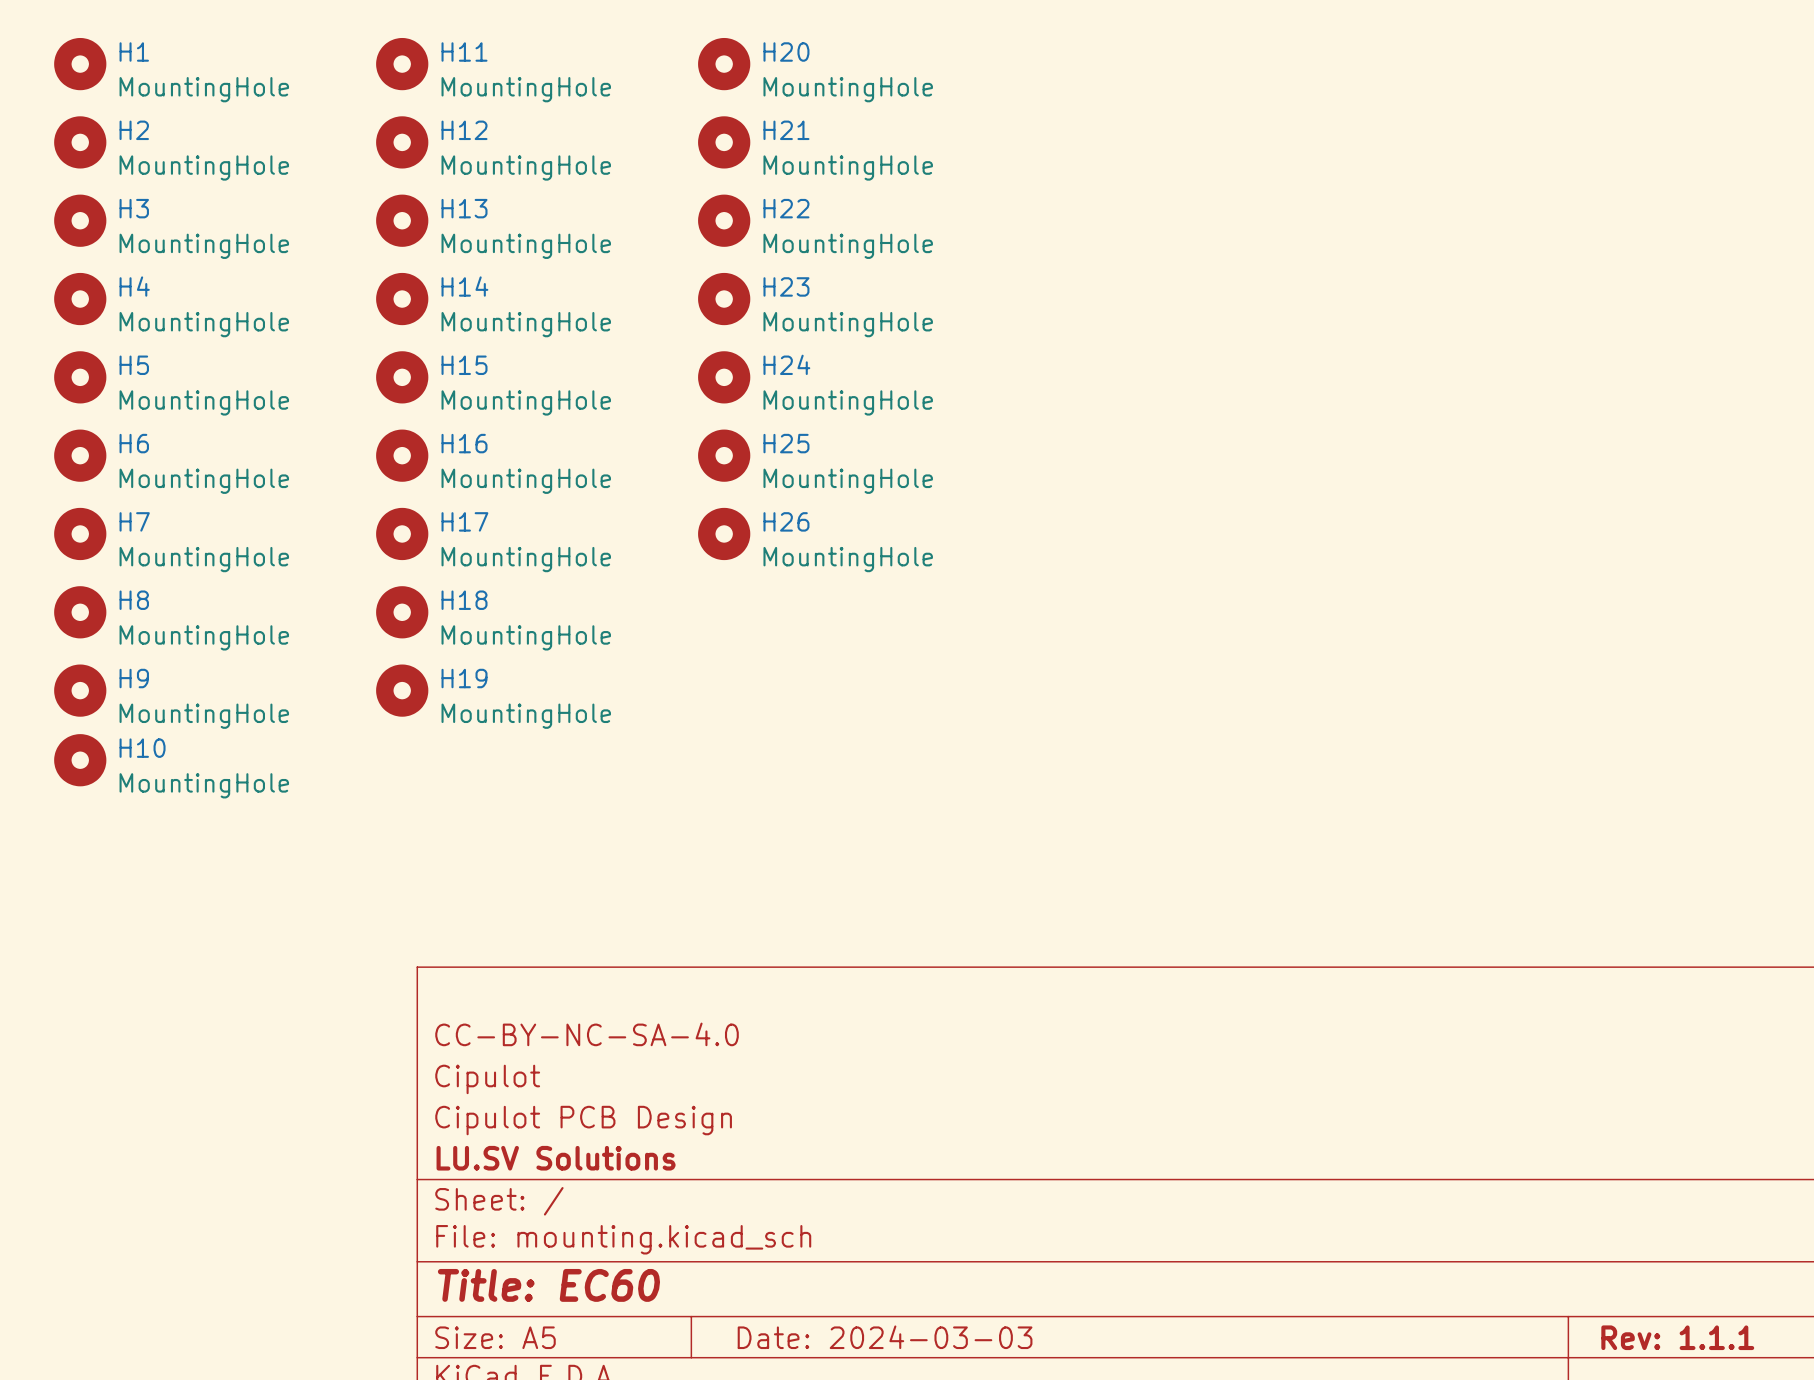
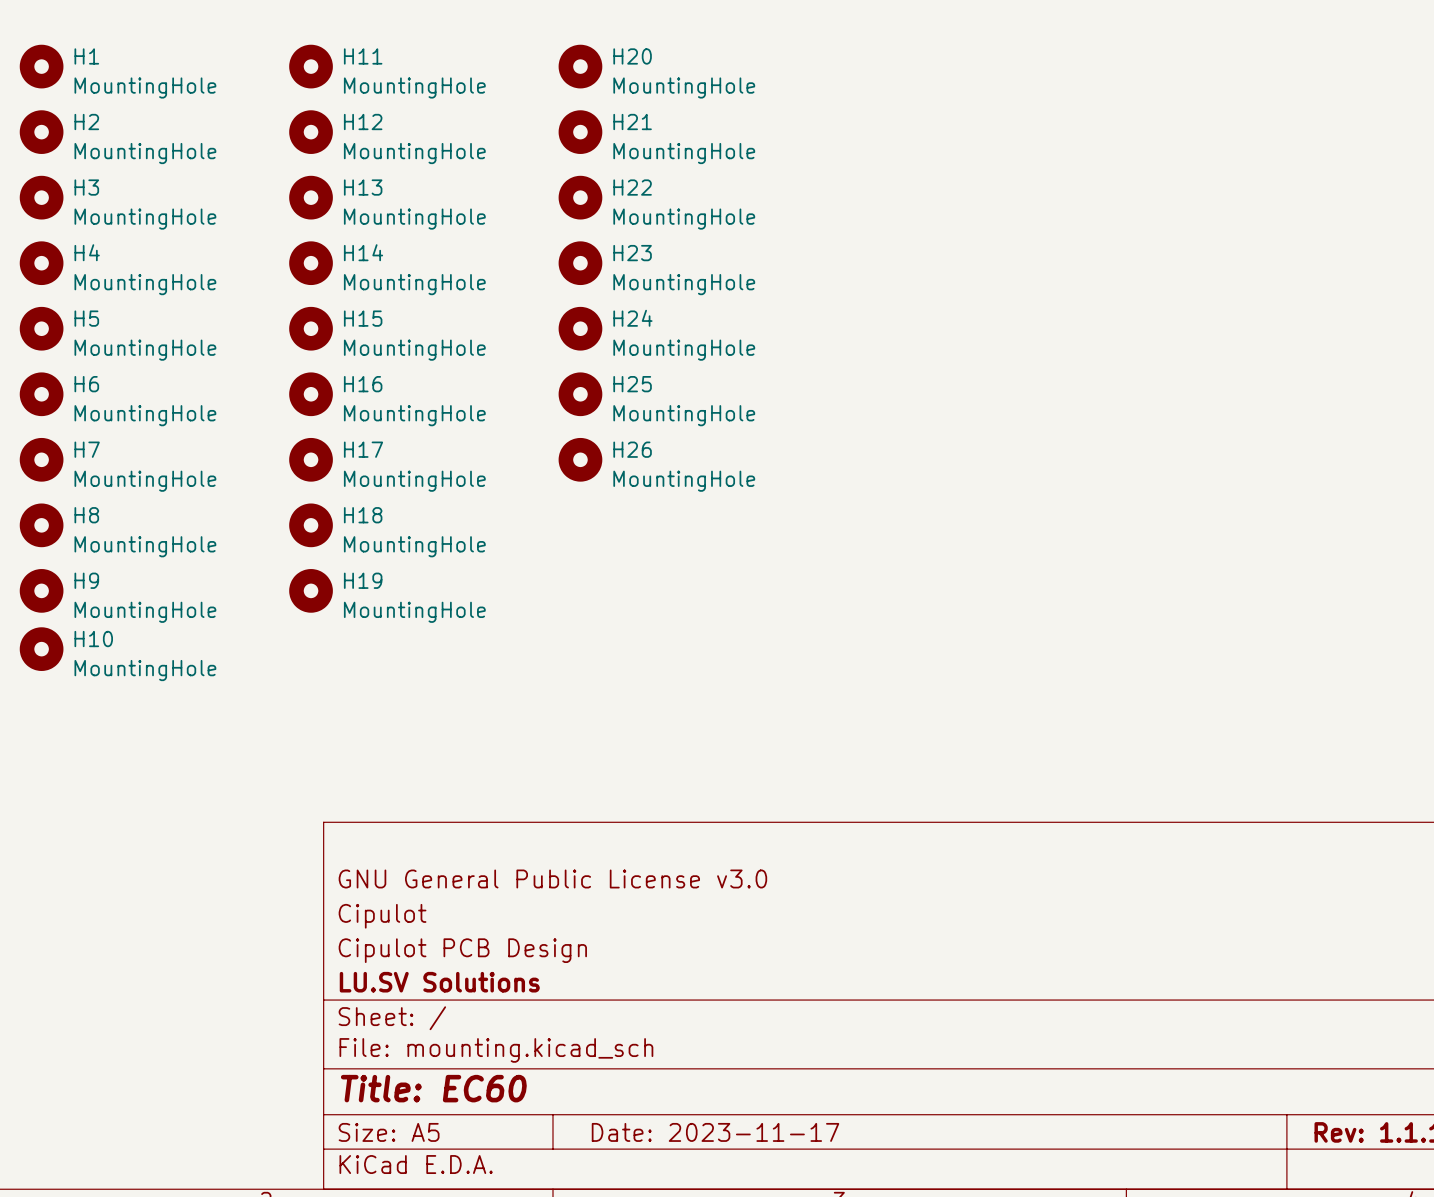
title block: CC-BY-NC-SA-4.0 (587, 1034) -> GNU General Public License v3.0 (552, 878)
title block: Date: 2024-03-03 (885, 1337) -> Date: 2023-11-17 (715, 1132)

